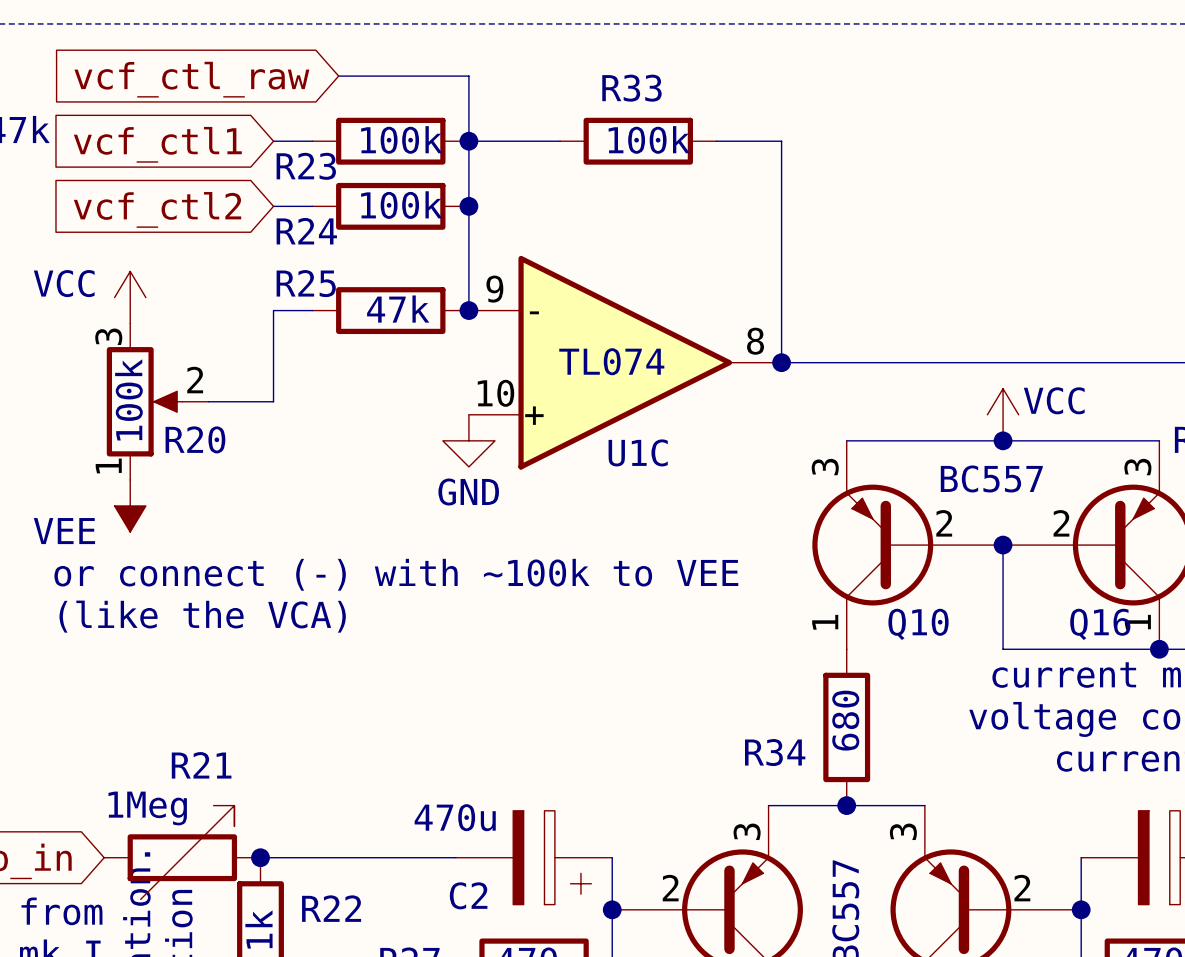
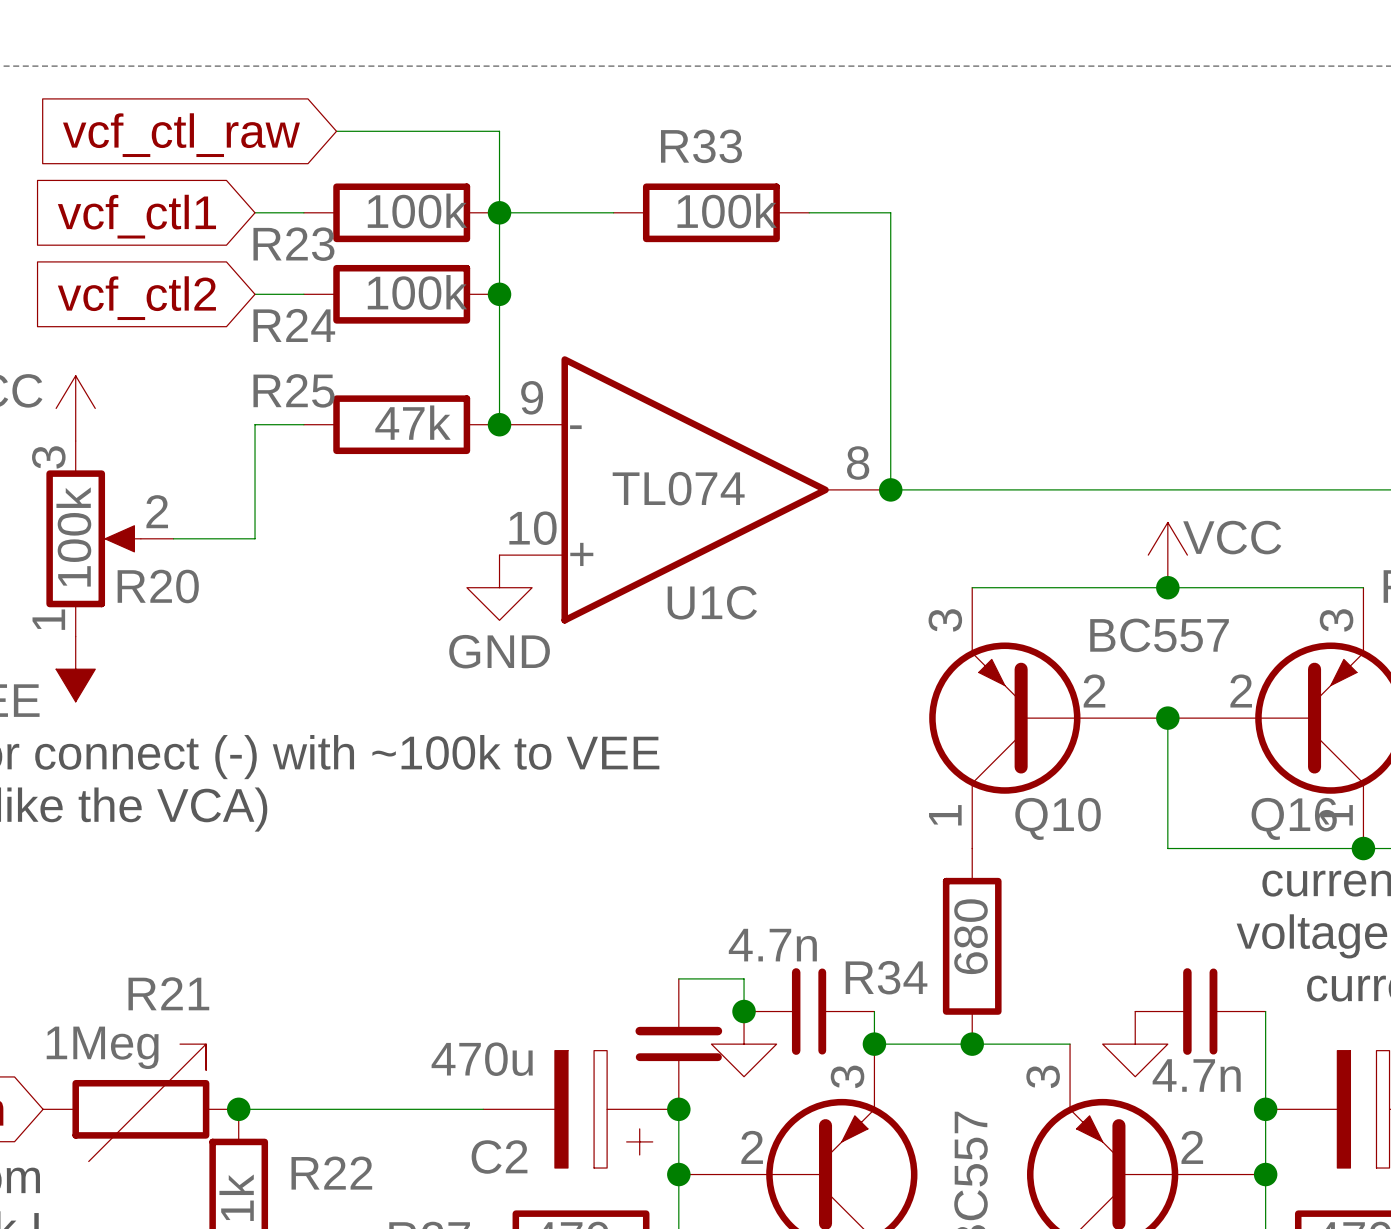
wire: none -> (678, 978) (744, 978) (744, 1011)
junction: none -> (744, 1011)
part: none -> 4.7n (809, 1011)
wire: none -> (874, 1011) (874, 1044)
part: none -> 4.7n (1200, 1011)
wire: none -> (1265, 1011) (1265, 1109)
part: none -> (678, 1044)
power symbol: none -> (744, 1044)
junction: none -> (874, 1044)
power symbol: none -> (1135, 1044)
junction: none -> (678, 1109)
junction: none -> (1265, 1109)

